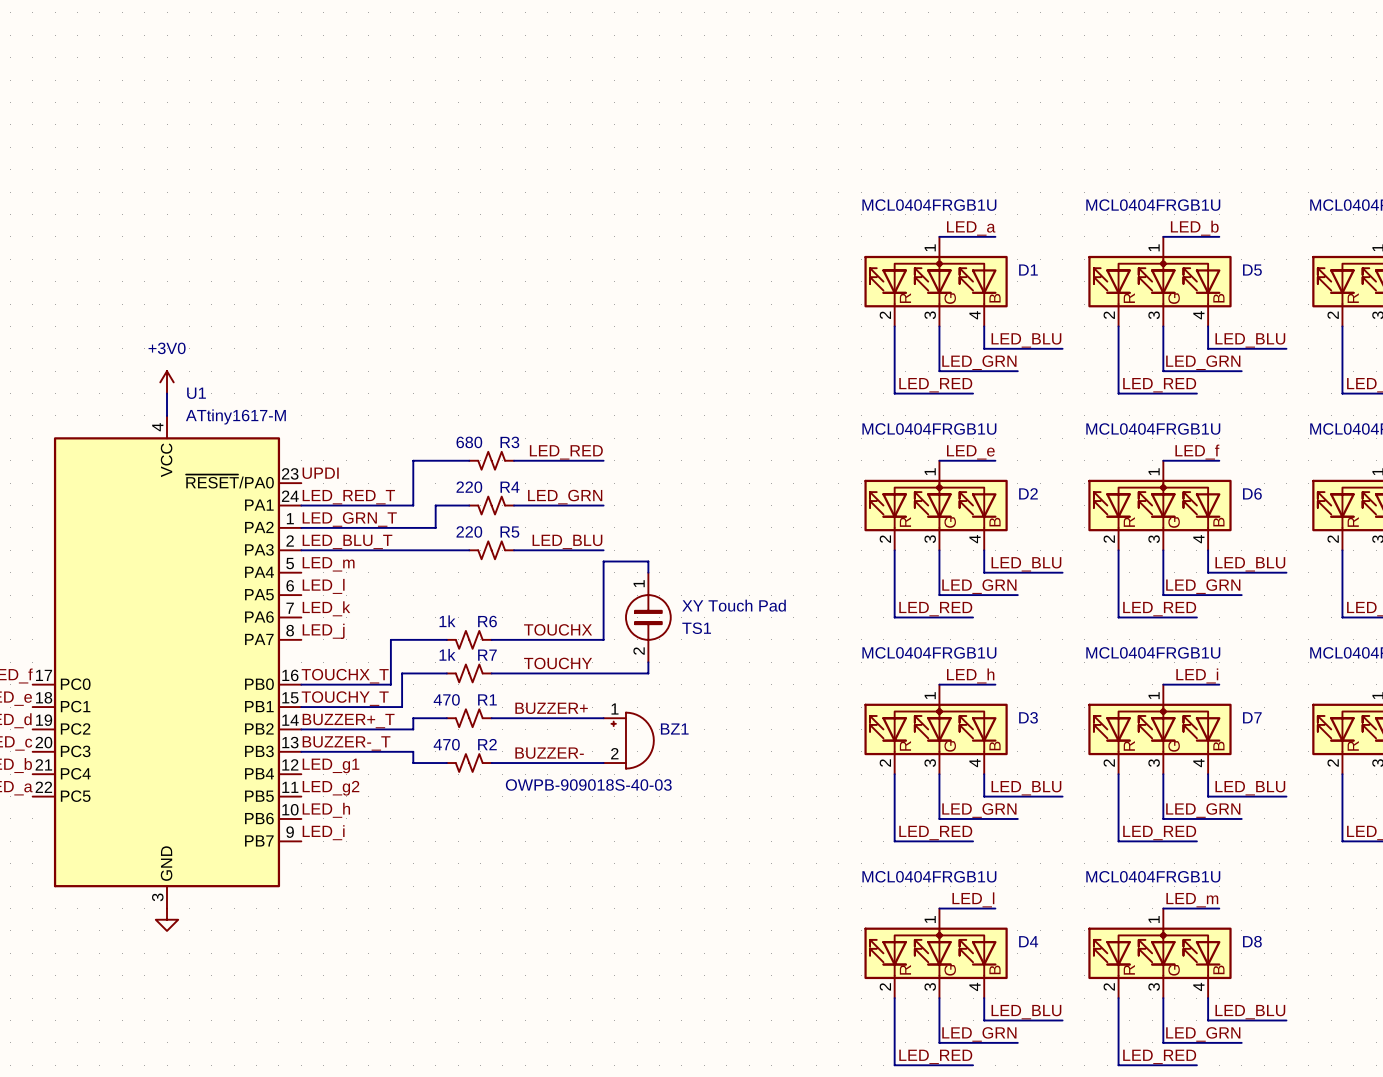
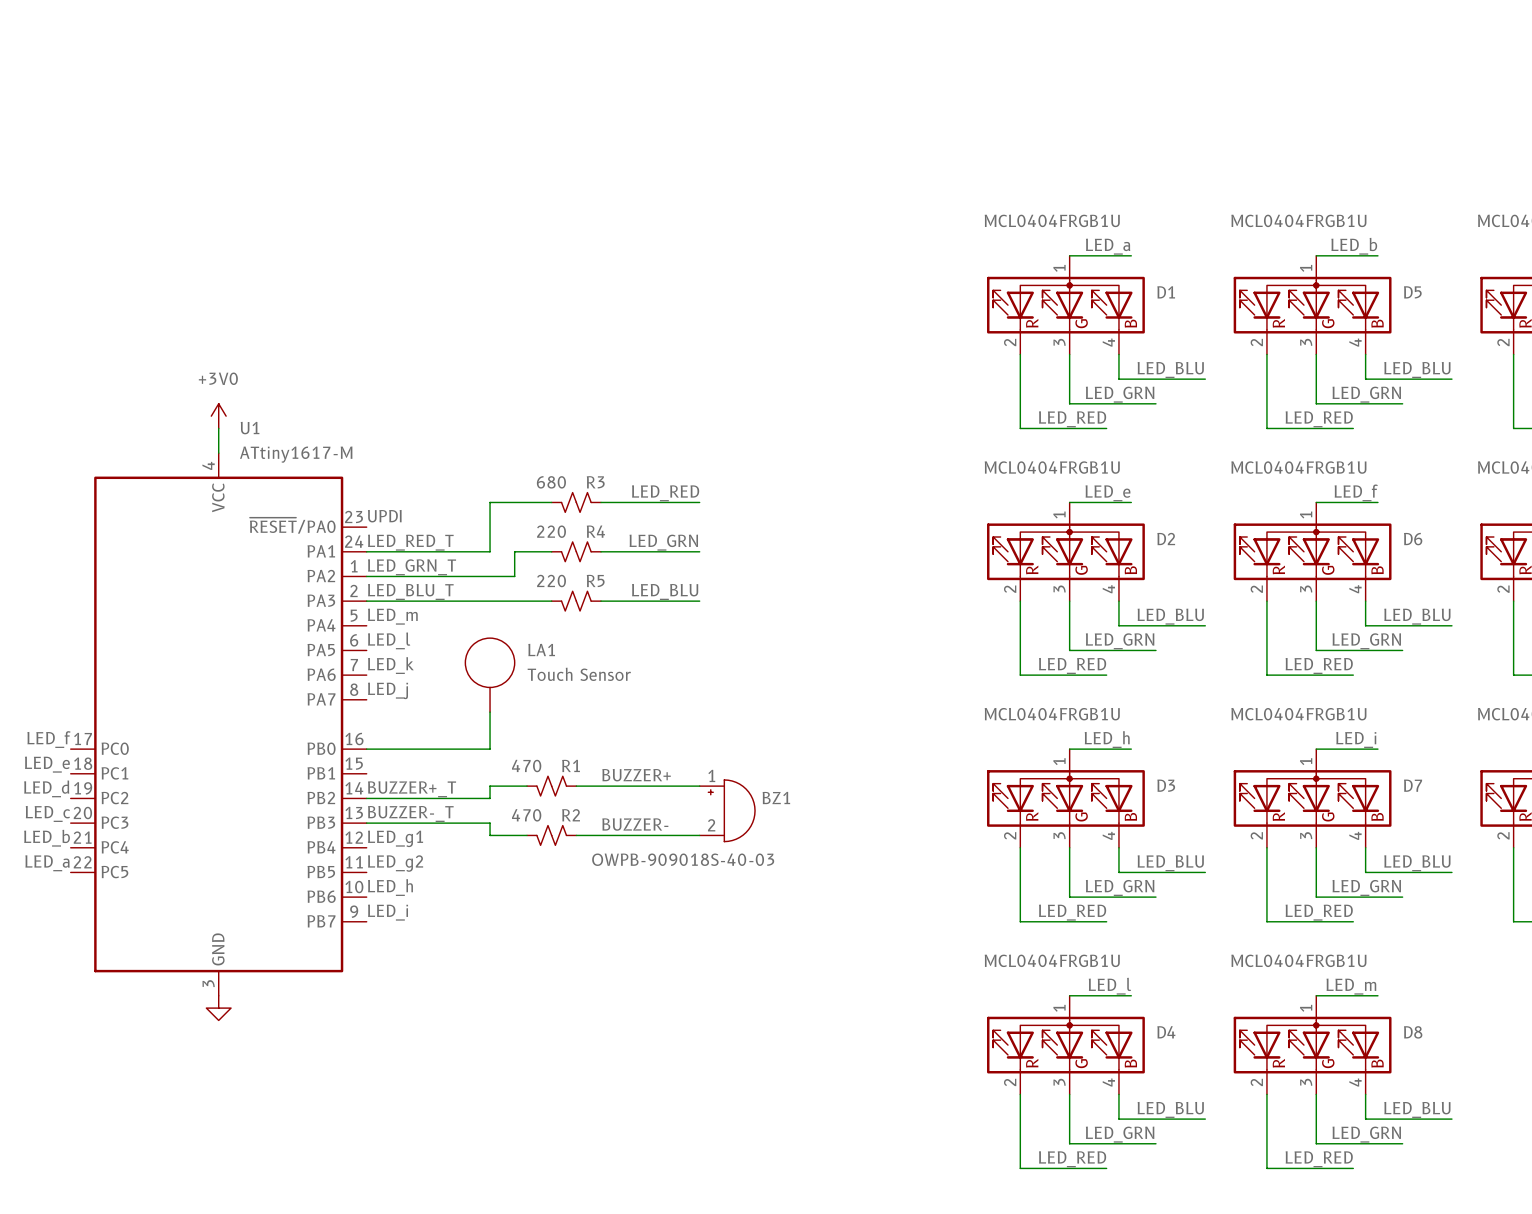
wire: (648, 572) (648, 561) (603, 561) (603, 639) (491, 639) -> none
LA1: none -> Touch Sensor (490, 675)
TS1: XY Touch Pad (648, 617) -> none
label: TOUCHX (558, 629) -> none
wire: (446, 639) (390, 639) (390, 684) -> (490, 712) (490, 749) (465, 749)
R6: 1k (469, 639) -> none
wire: (648, 662) (648, 673) (491, 673) -> none
label: TOUCHY (558, 663) -> none
wire: (446, 673) (402, 673) (402, 707) (301, 707) -> none
R7: 1k (469, 673) -> none
label: TOUCHX_T (345, 676) -> none
label: TOUCHY_T (345, 698) -> none

